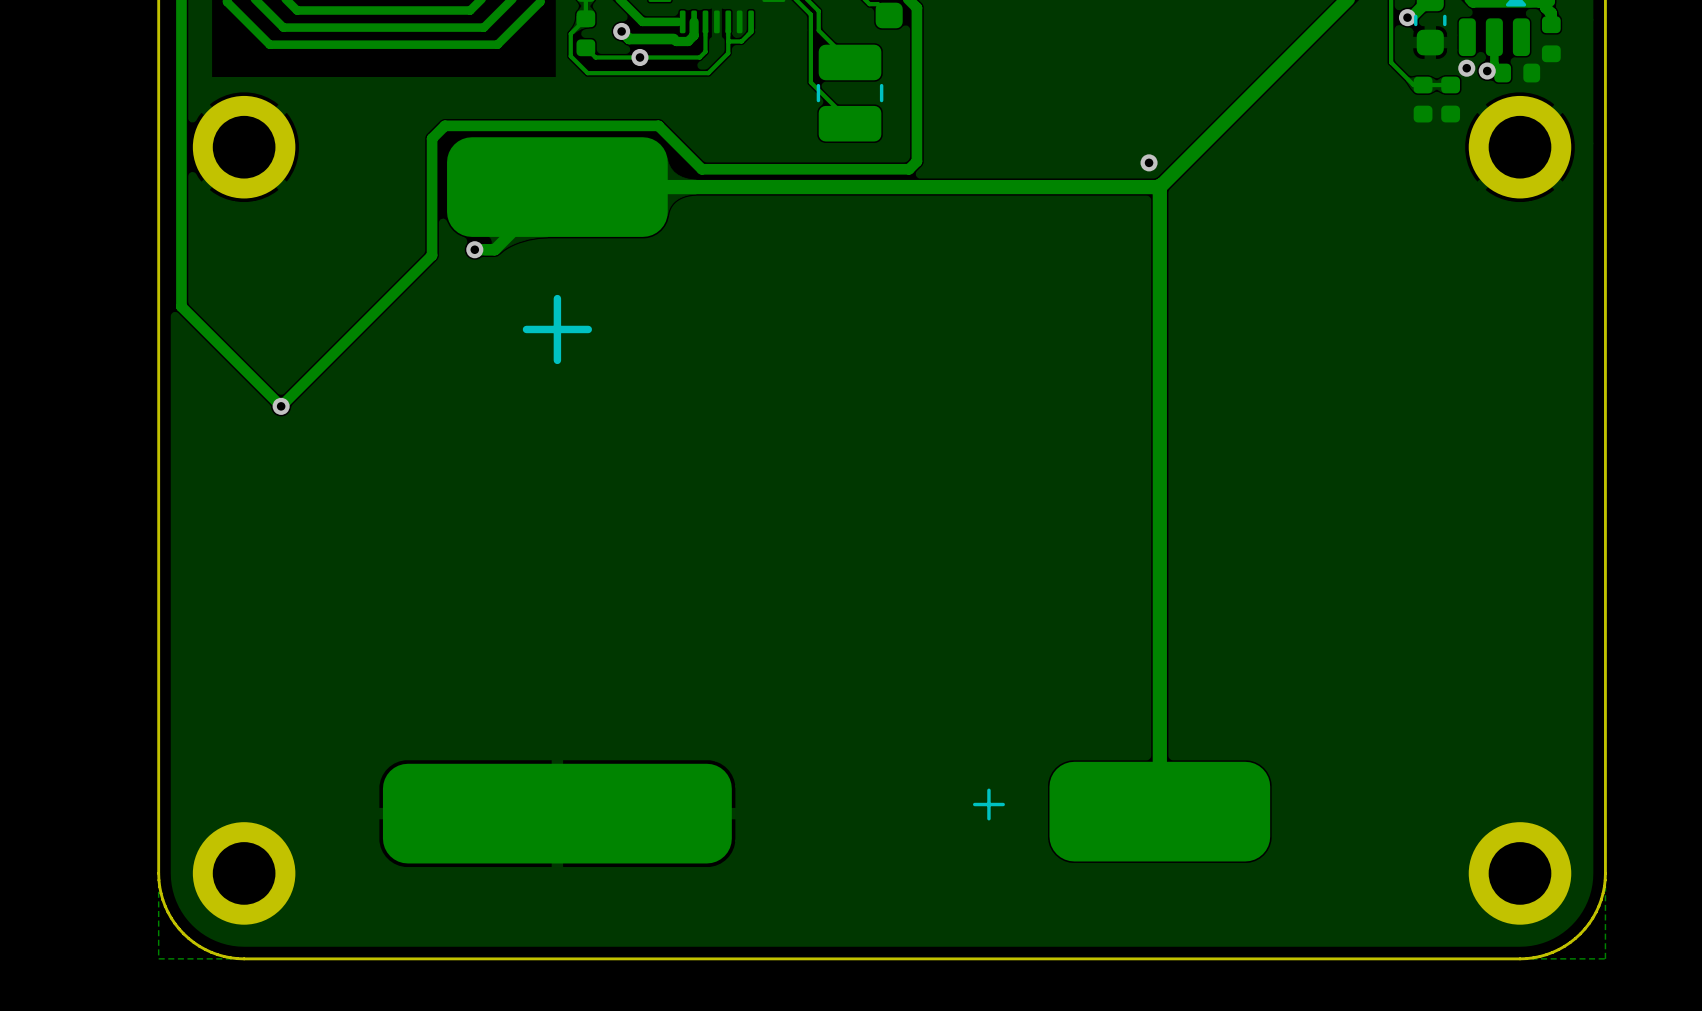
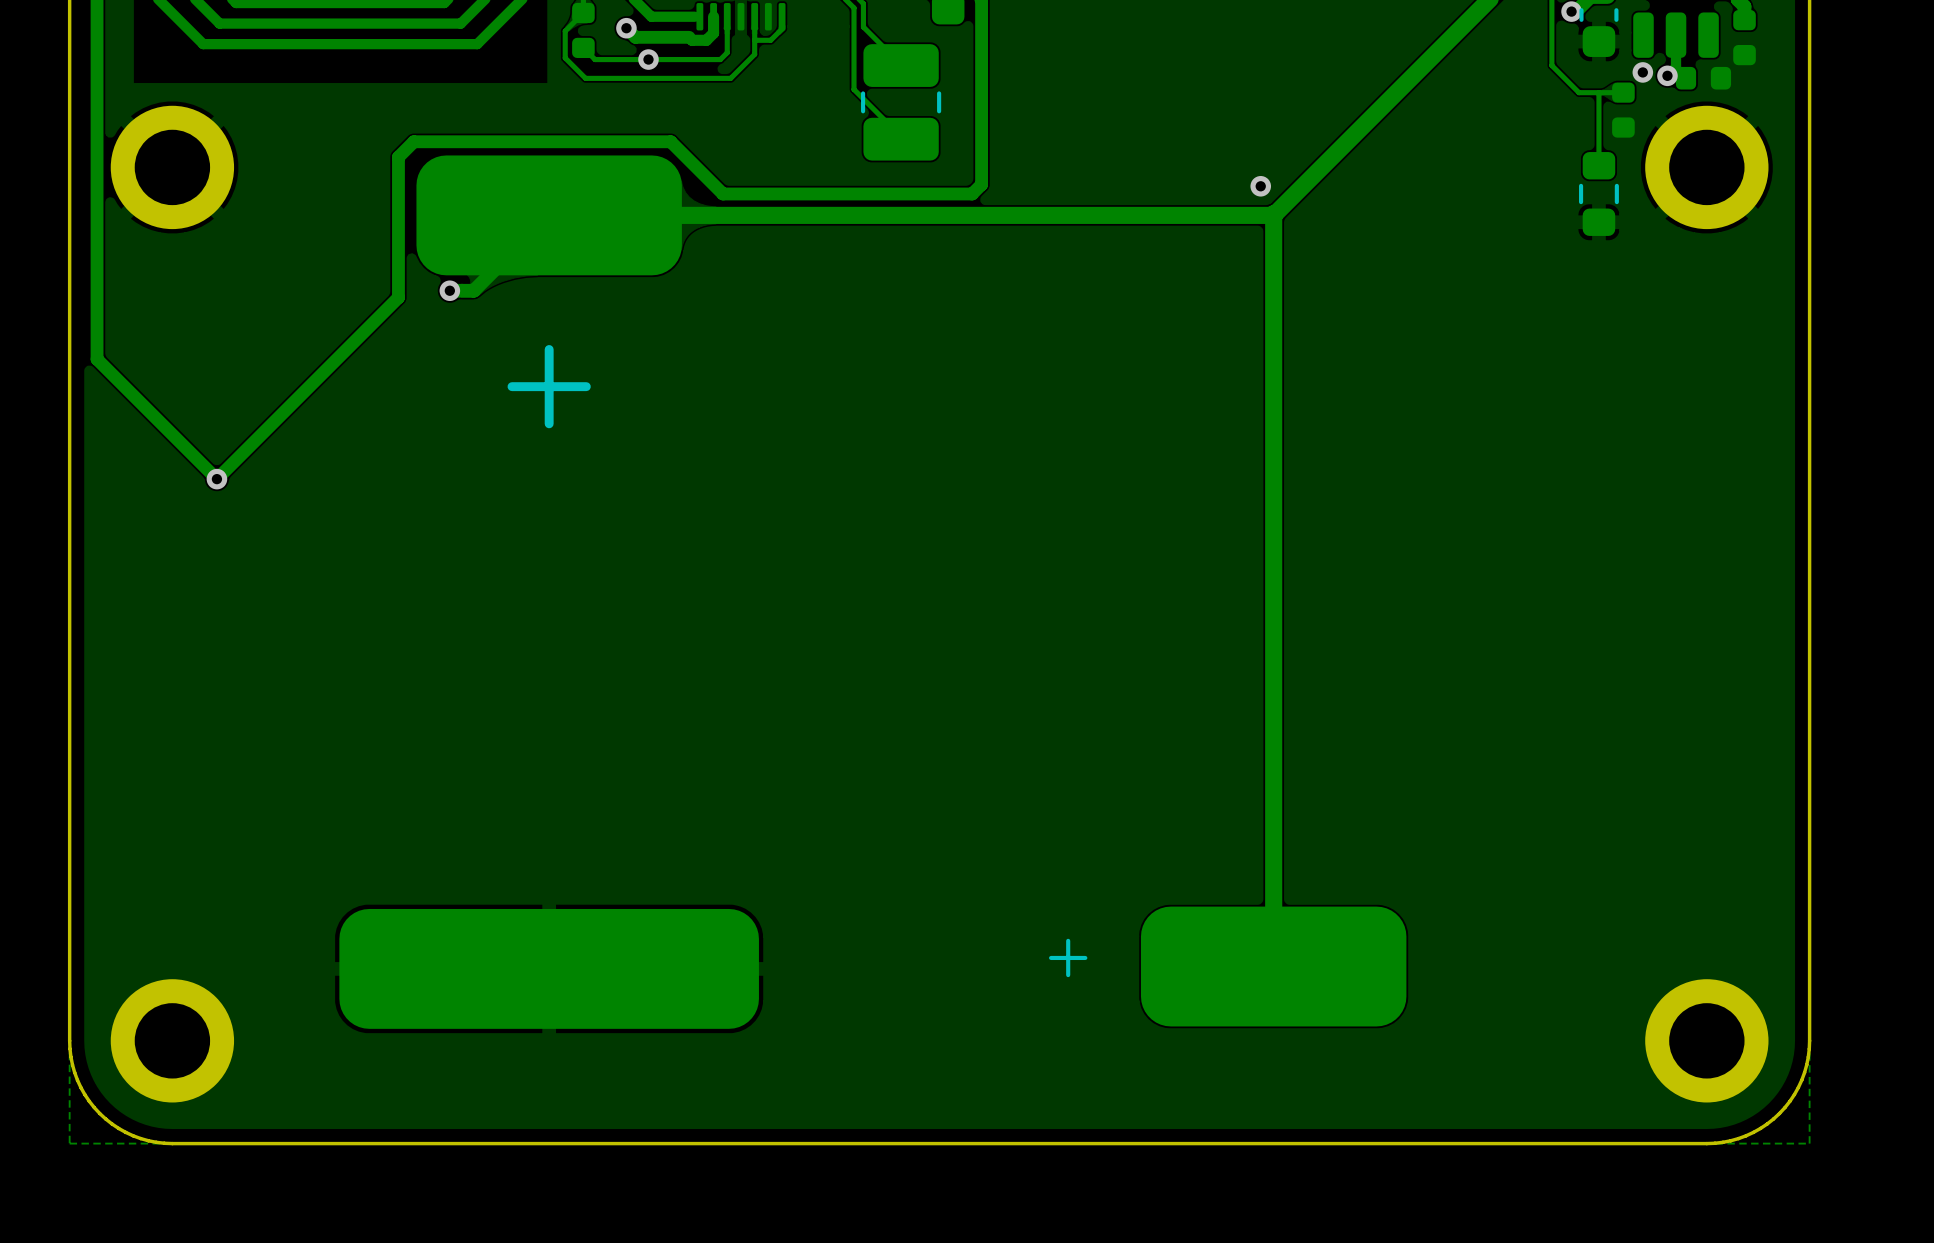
track: none -> (1598, 92) (1598, 165)
part: (1423, 99) -> none
part: none -> (1598, 193)

